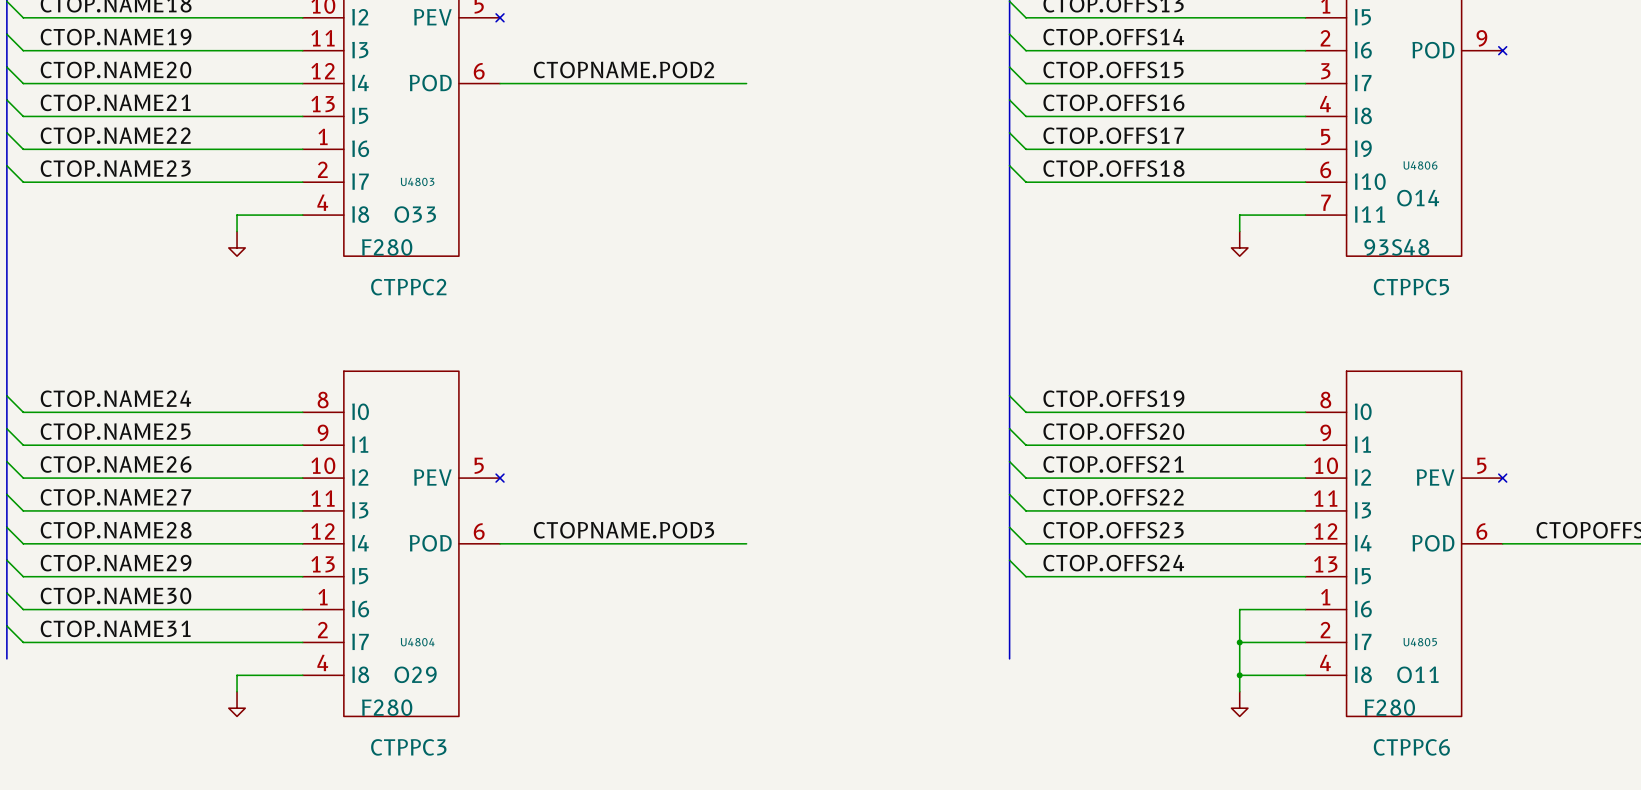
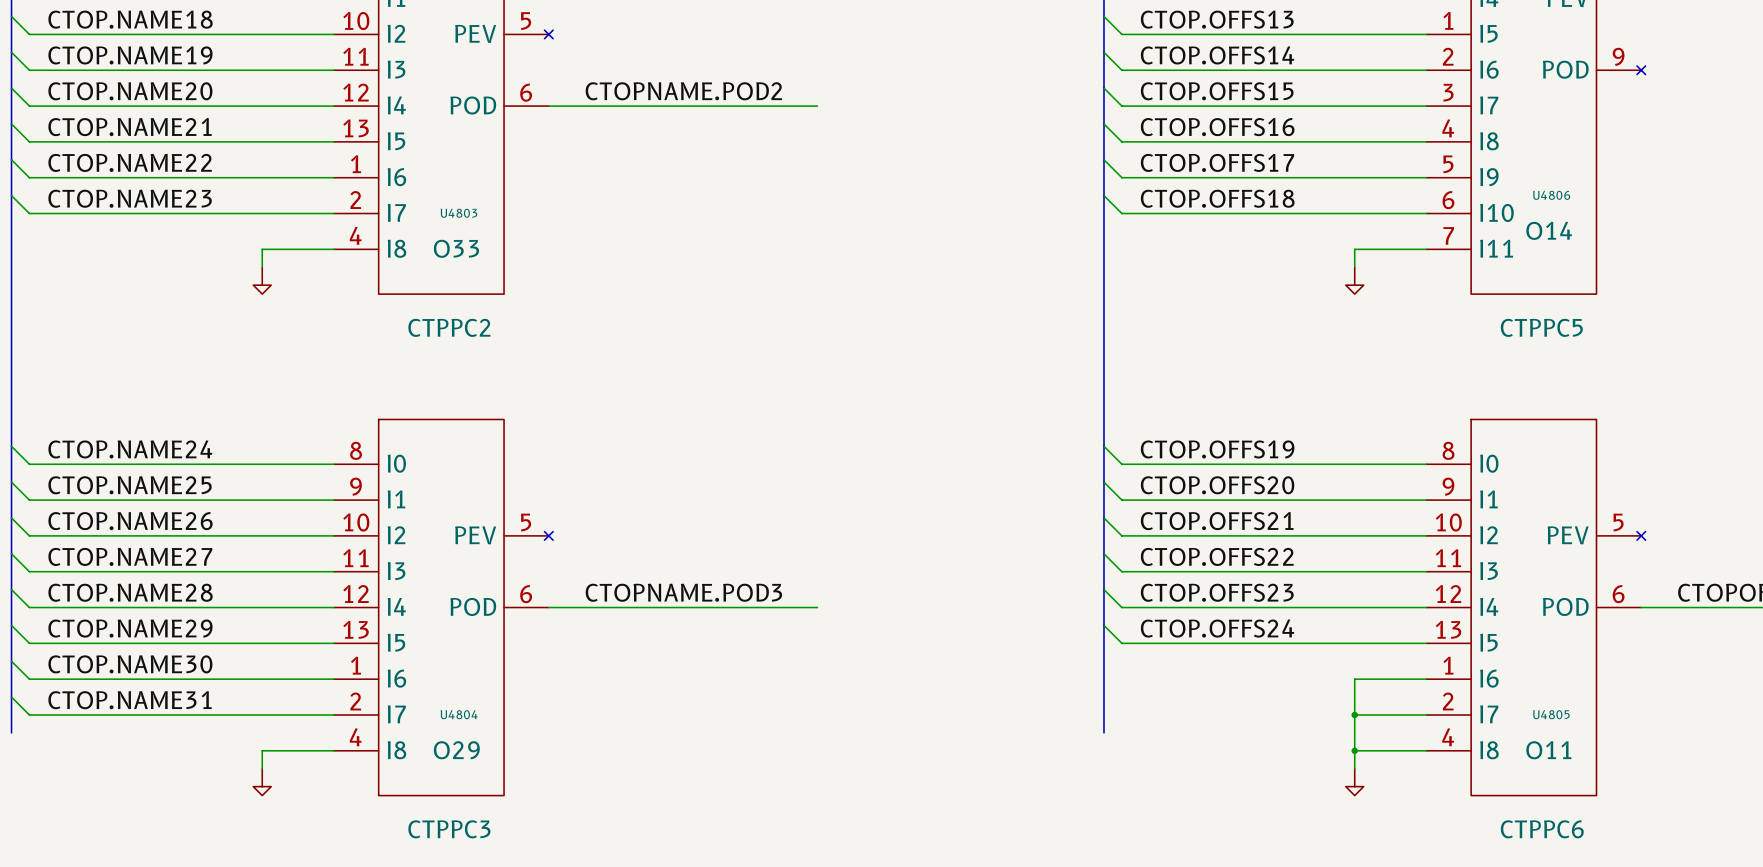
U4803 value: F280 (387, 247) -> none
U4806 value: 93S48 (1396, 247) -> none
U4804 value: F280 (387, 707) -> none
U4805 value: F280 (1389, 707) -> none

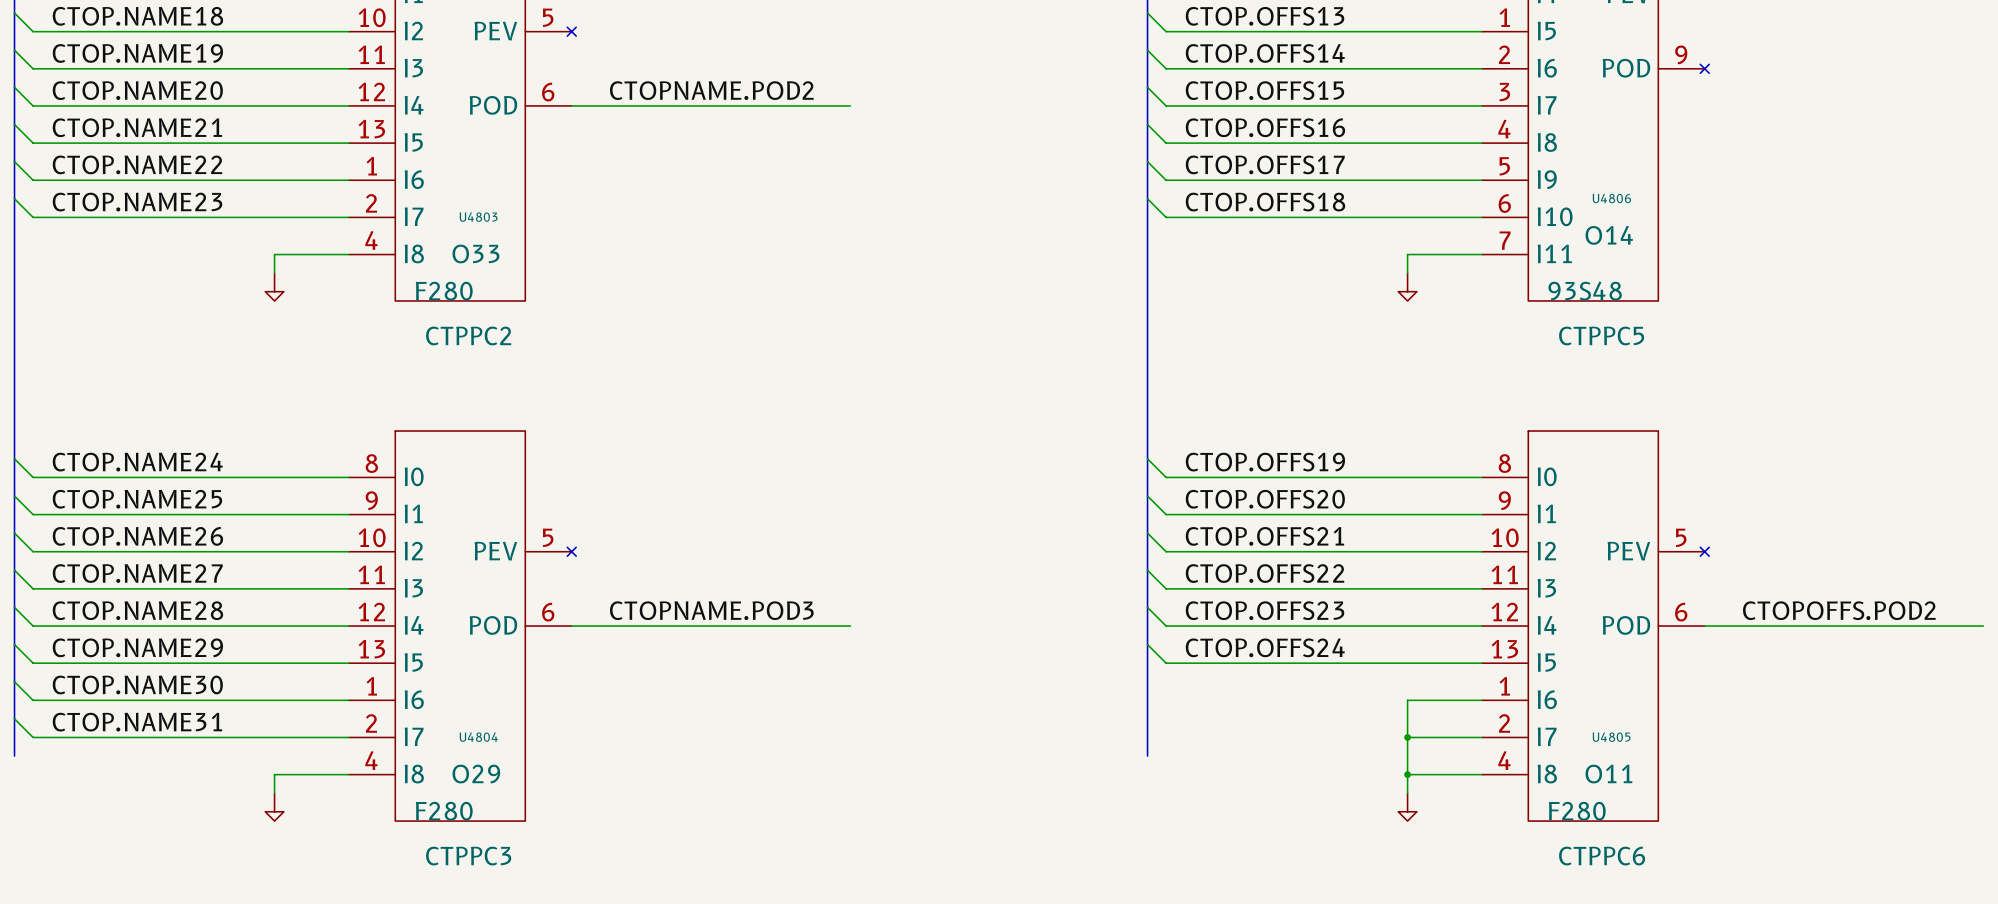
U4803 value: none -> F280 (444, 291)
U4806 value: none -> 93S48 (1585, 291)
U4804 value: none -> F280 (444, 811)
U4805 value: none -> F280 (1577, 811)

